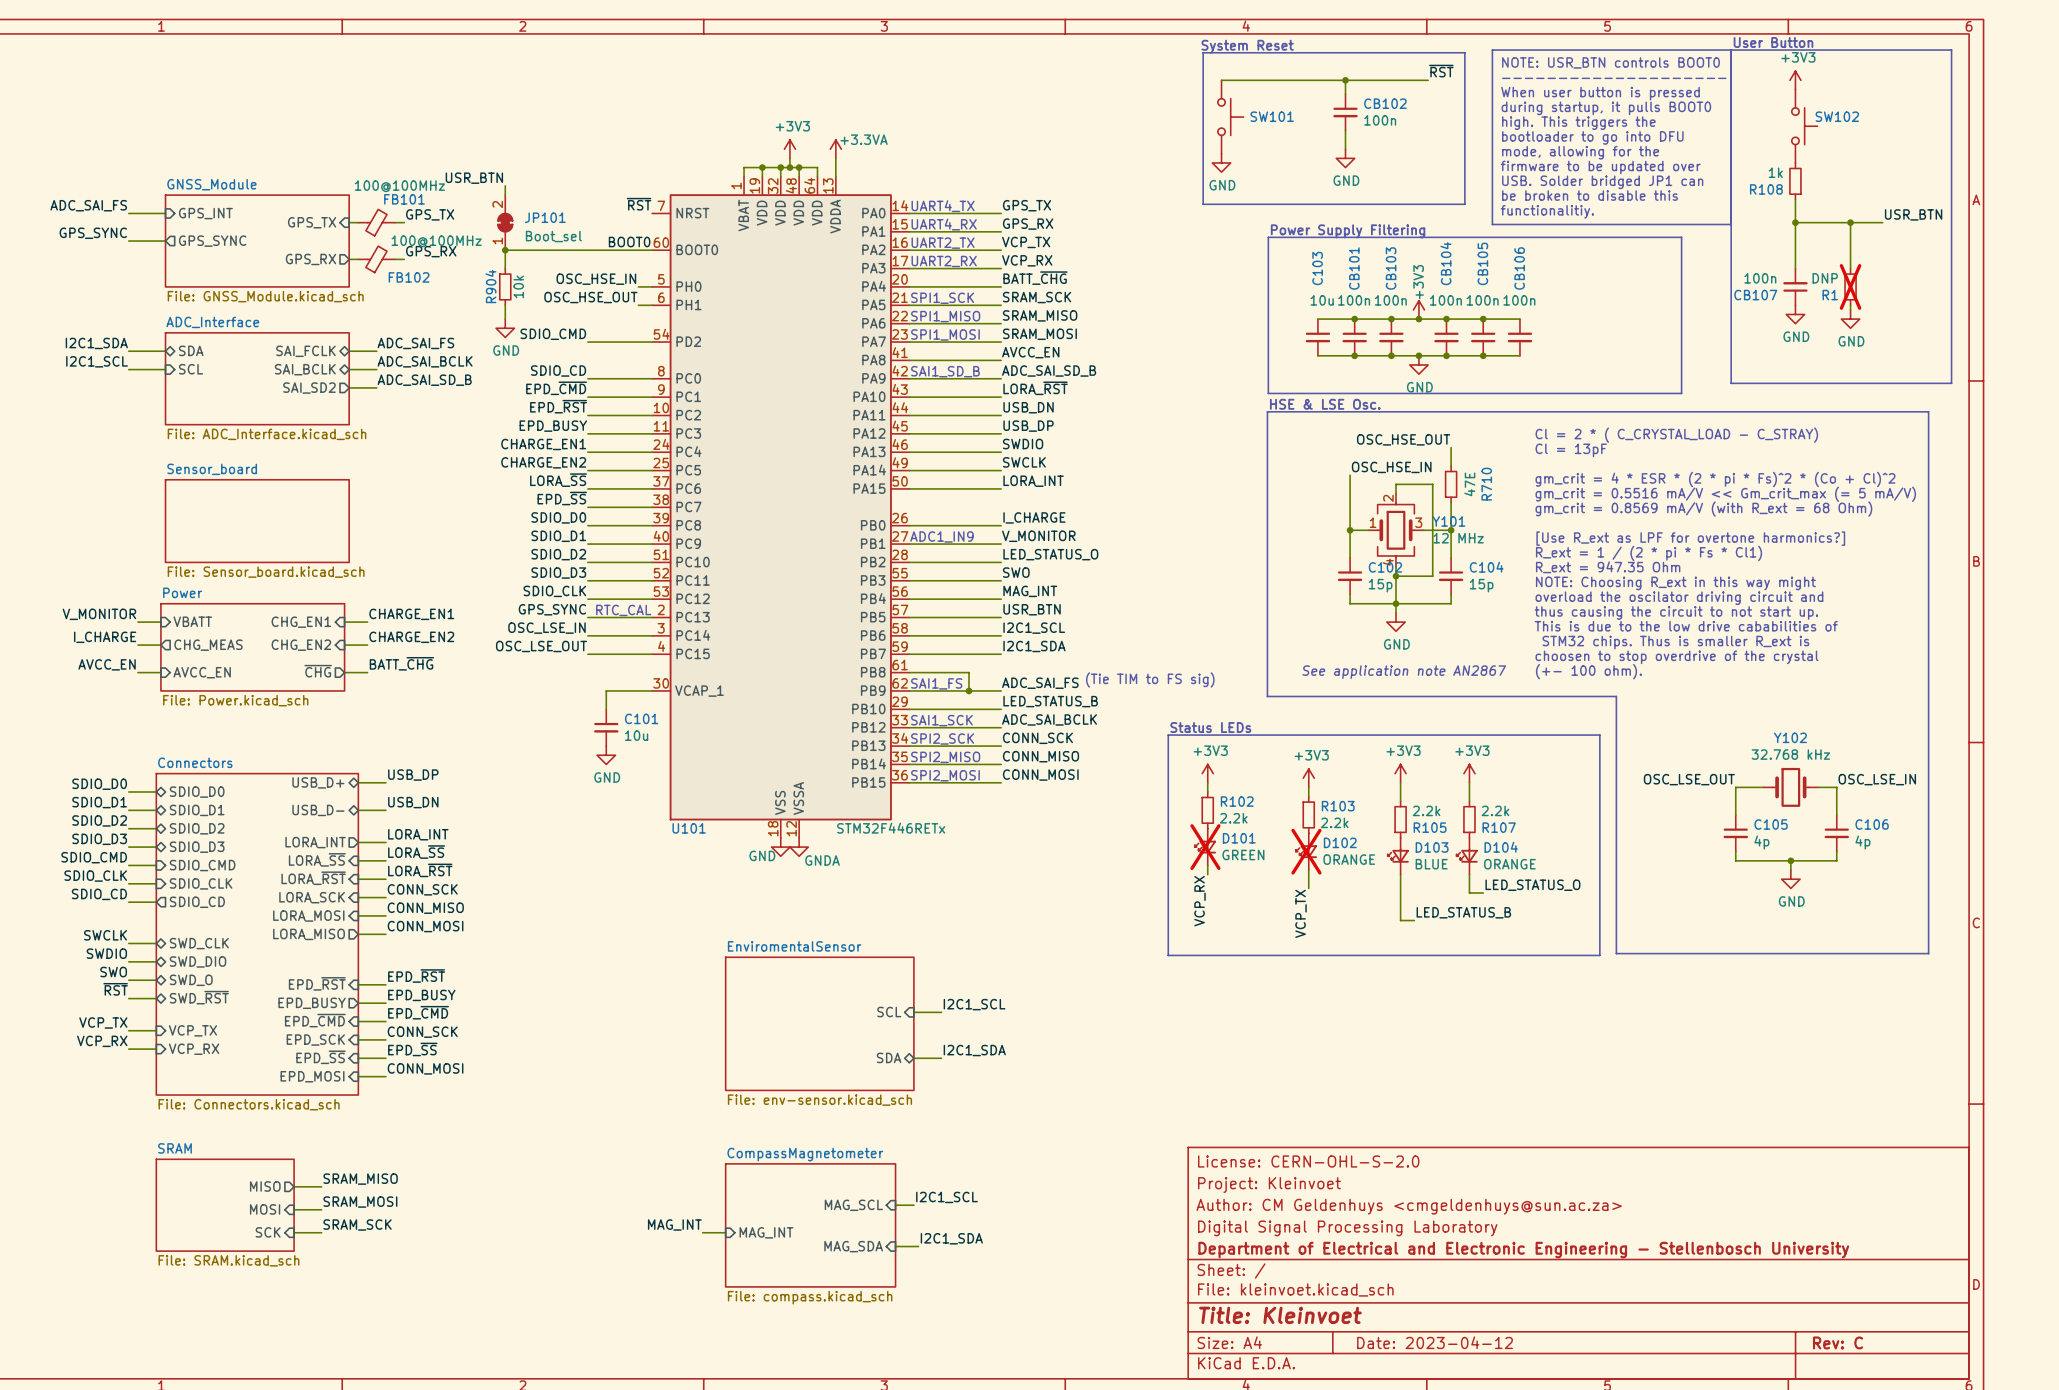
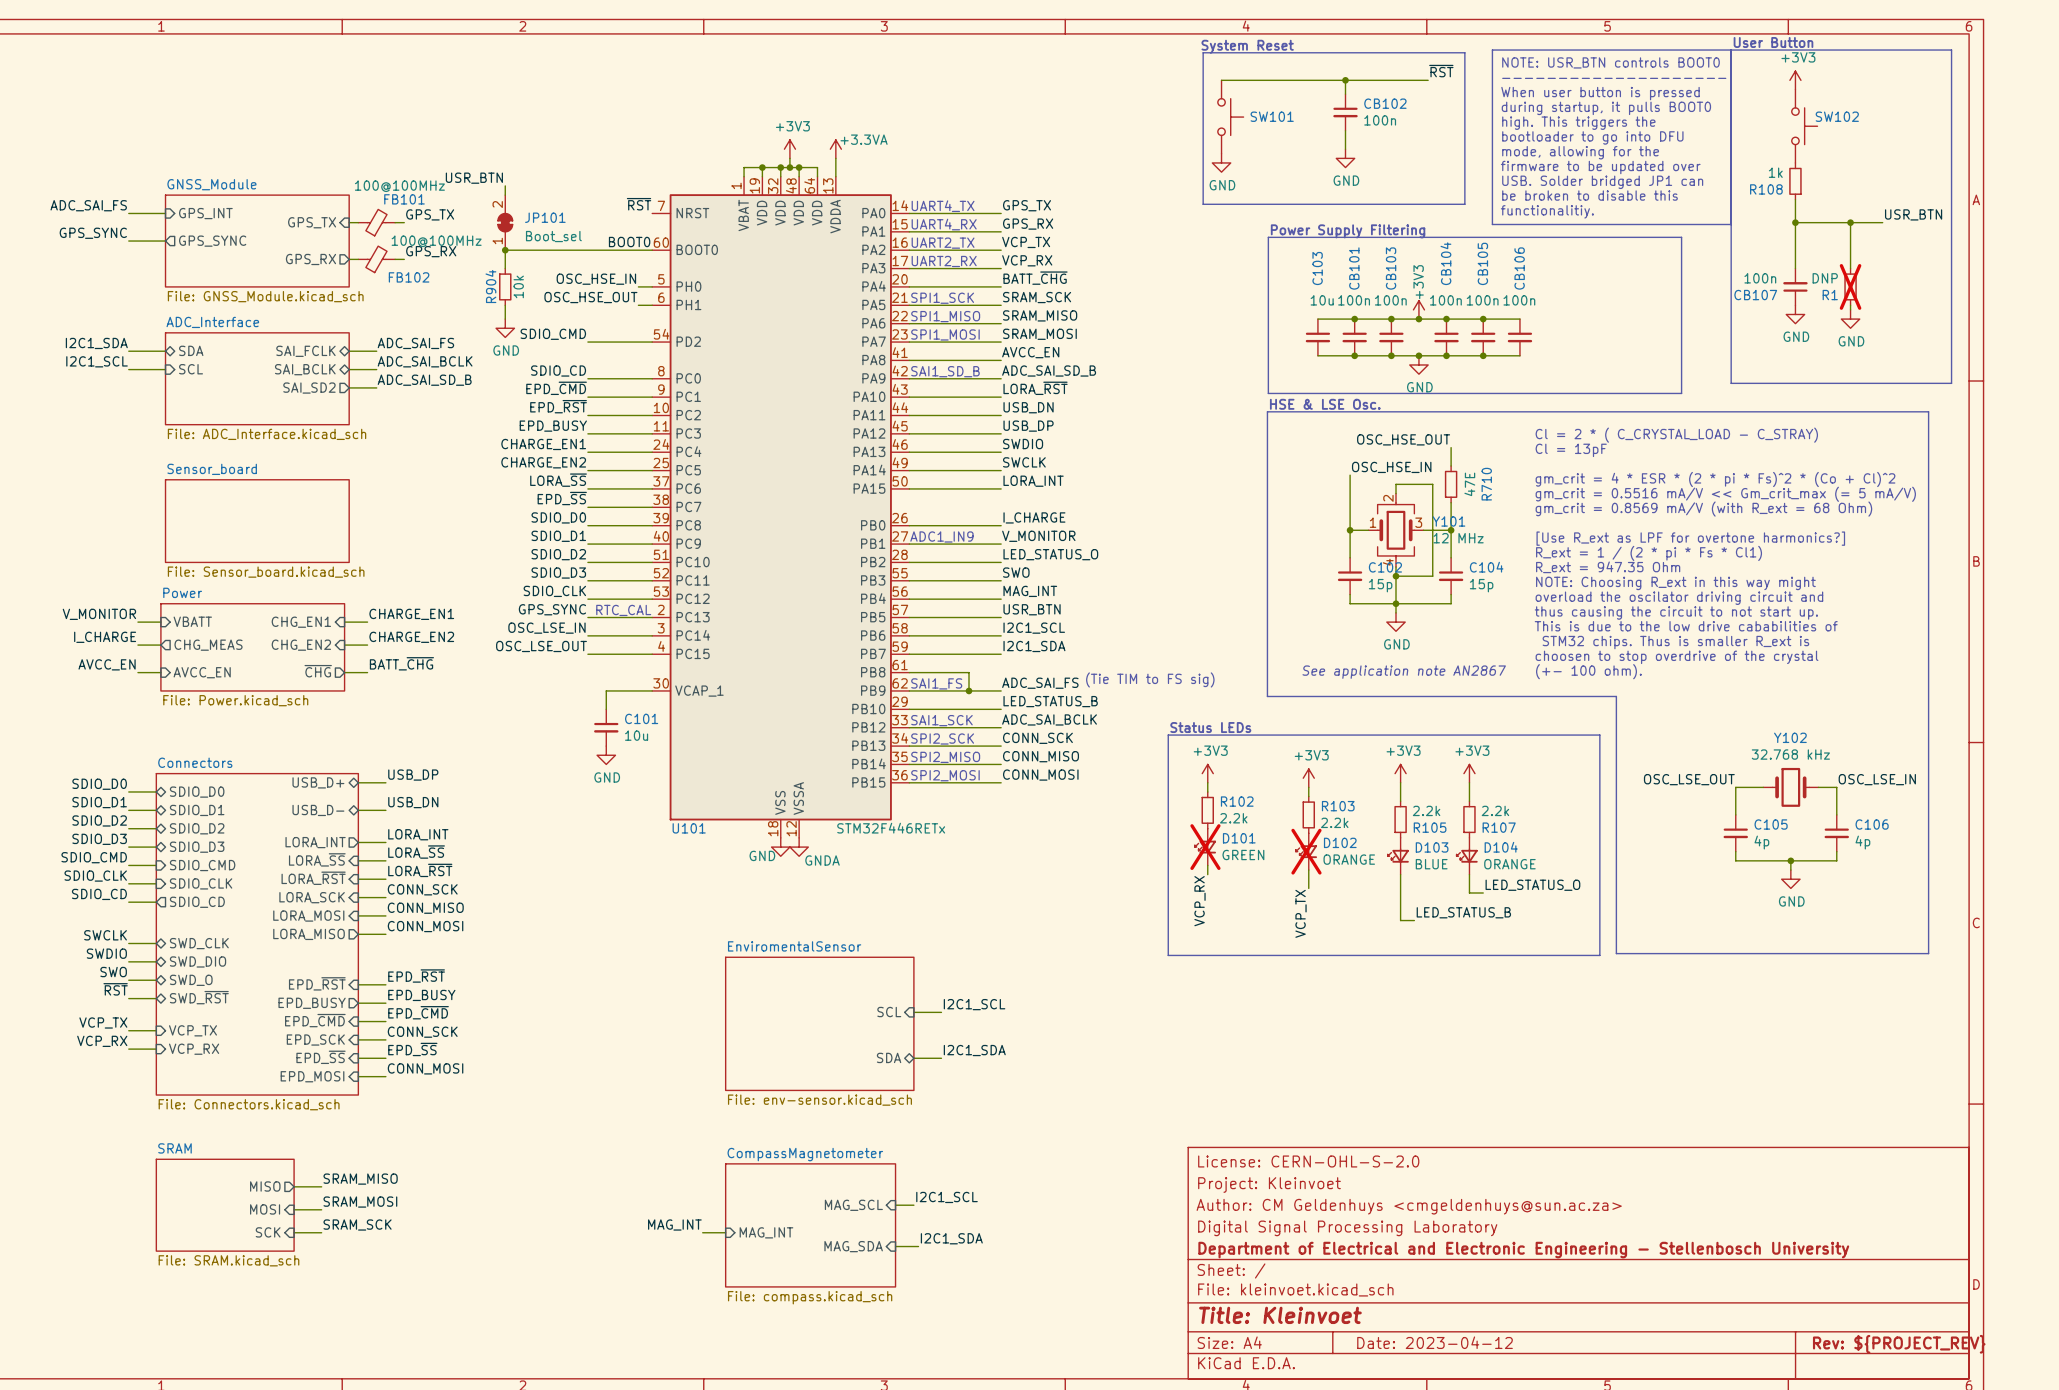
title block: Rev: C (1838, 1342) -> Rev: ${PROJECT_REV} (1899, 1344)

